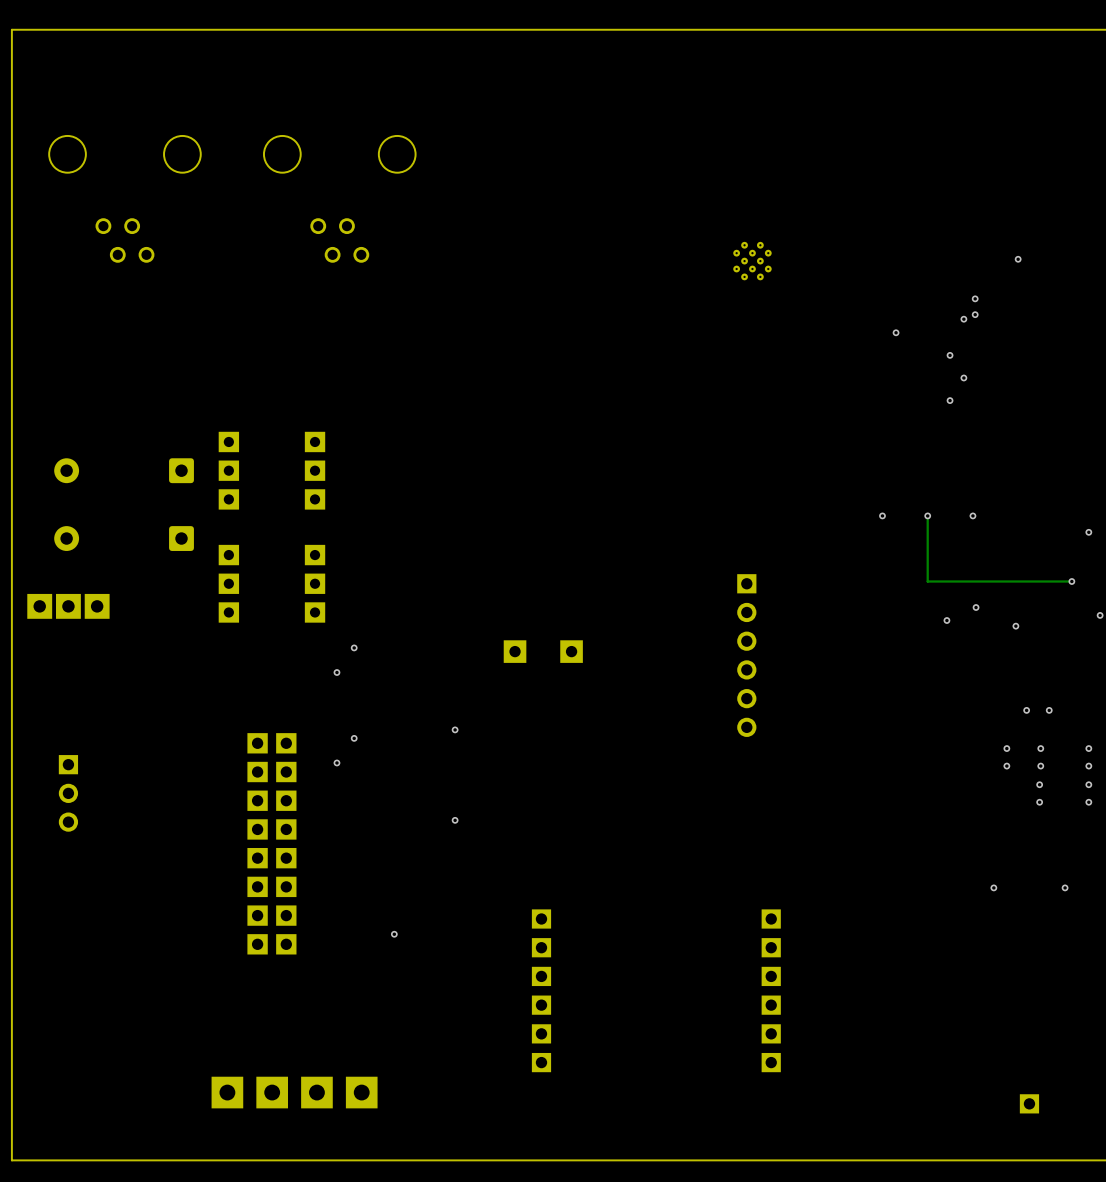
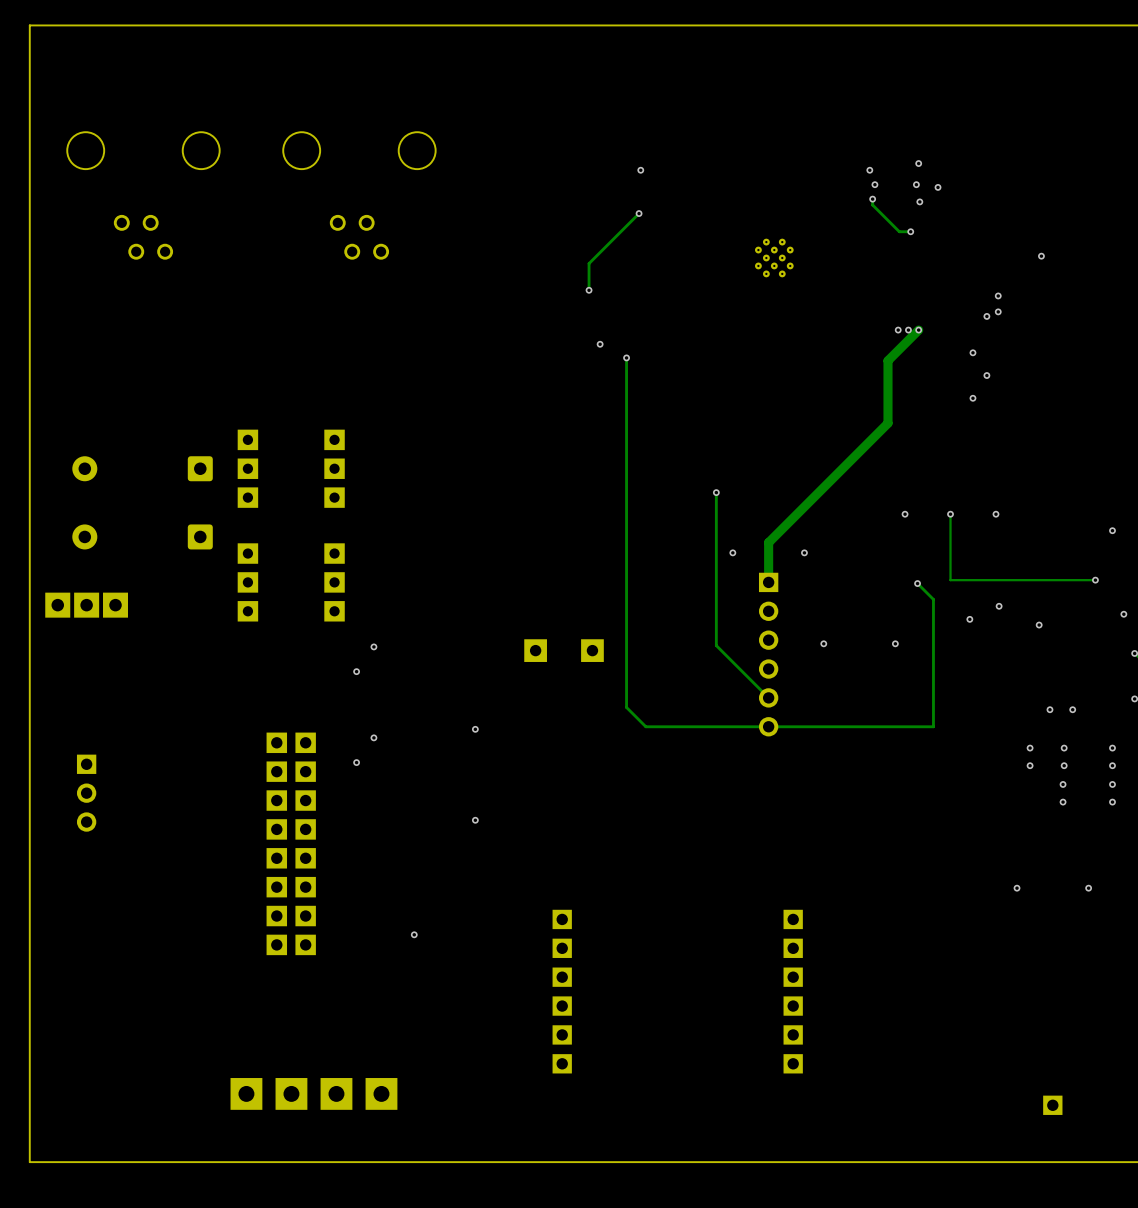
via: none -> (918, 163)
via: none -> (640, 170)
via: none -> (869, 170)
via: none -> (874, 184)
via: none -> (916, 184)
via: none -> (938, 187)
track: none -> (872, 199) (872, 205) (899, 231) (910, 231)
via: none -> (872, 199)
via: none -> (919, 201)
track: none -> (639, 213) (589, 263) (589, 290)
via: none -> (639, 213)
via: none -> (910, 231)
via: none -> (589, 290)
via: none -> (898, 330)
via: none -> (908, 330)
track: none -> (918, 330) (887, 360) (887, 423) (768, 542) (768, 582)
via: none -> (600, 344)
track: none -> (626, 357) (626, 707) (645, 726) (933, 726) (933, 599) (917, 583)
via: none -> (626, 357)
track: none -> (716, 492) (716, 645) (768, 697)
via: none -> (716, 492)
via: none -> (732, 552)
via: none -> (804, 552)
via: none -> (917, 583)
via: none -> (823, 643)
via: none -> (895, 643)

